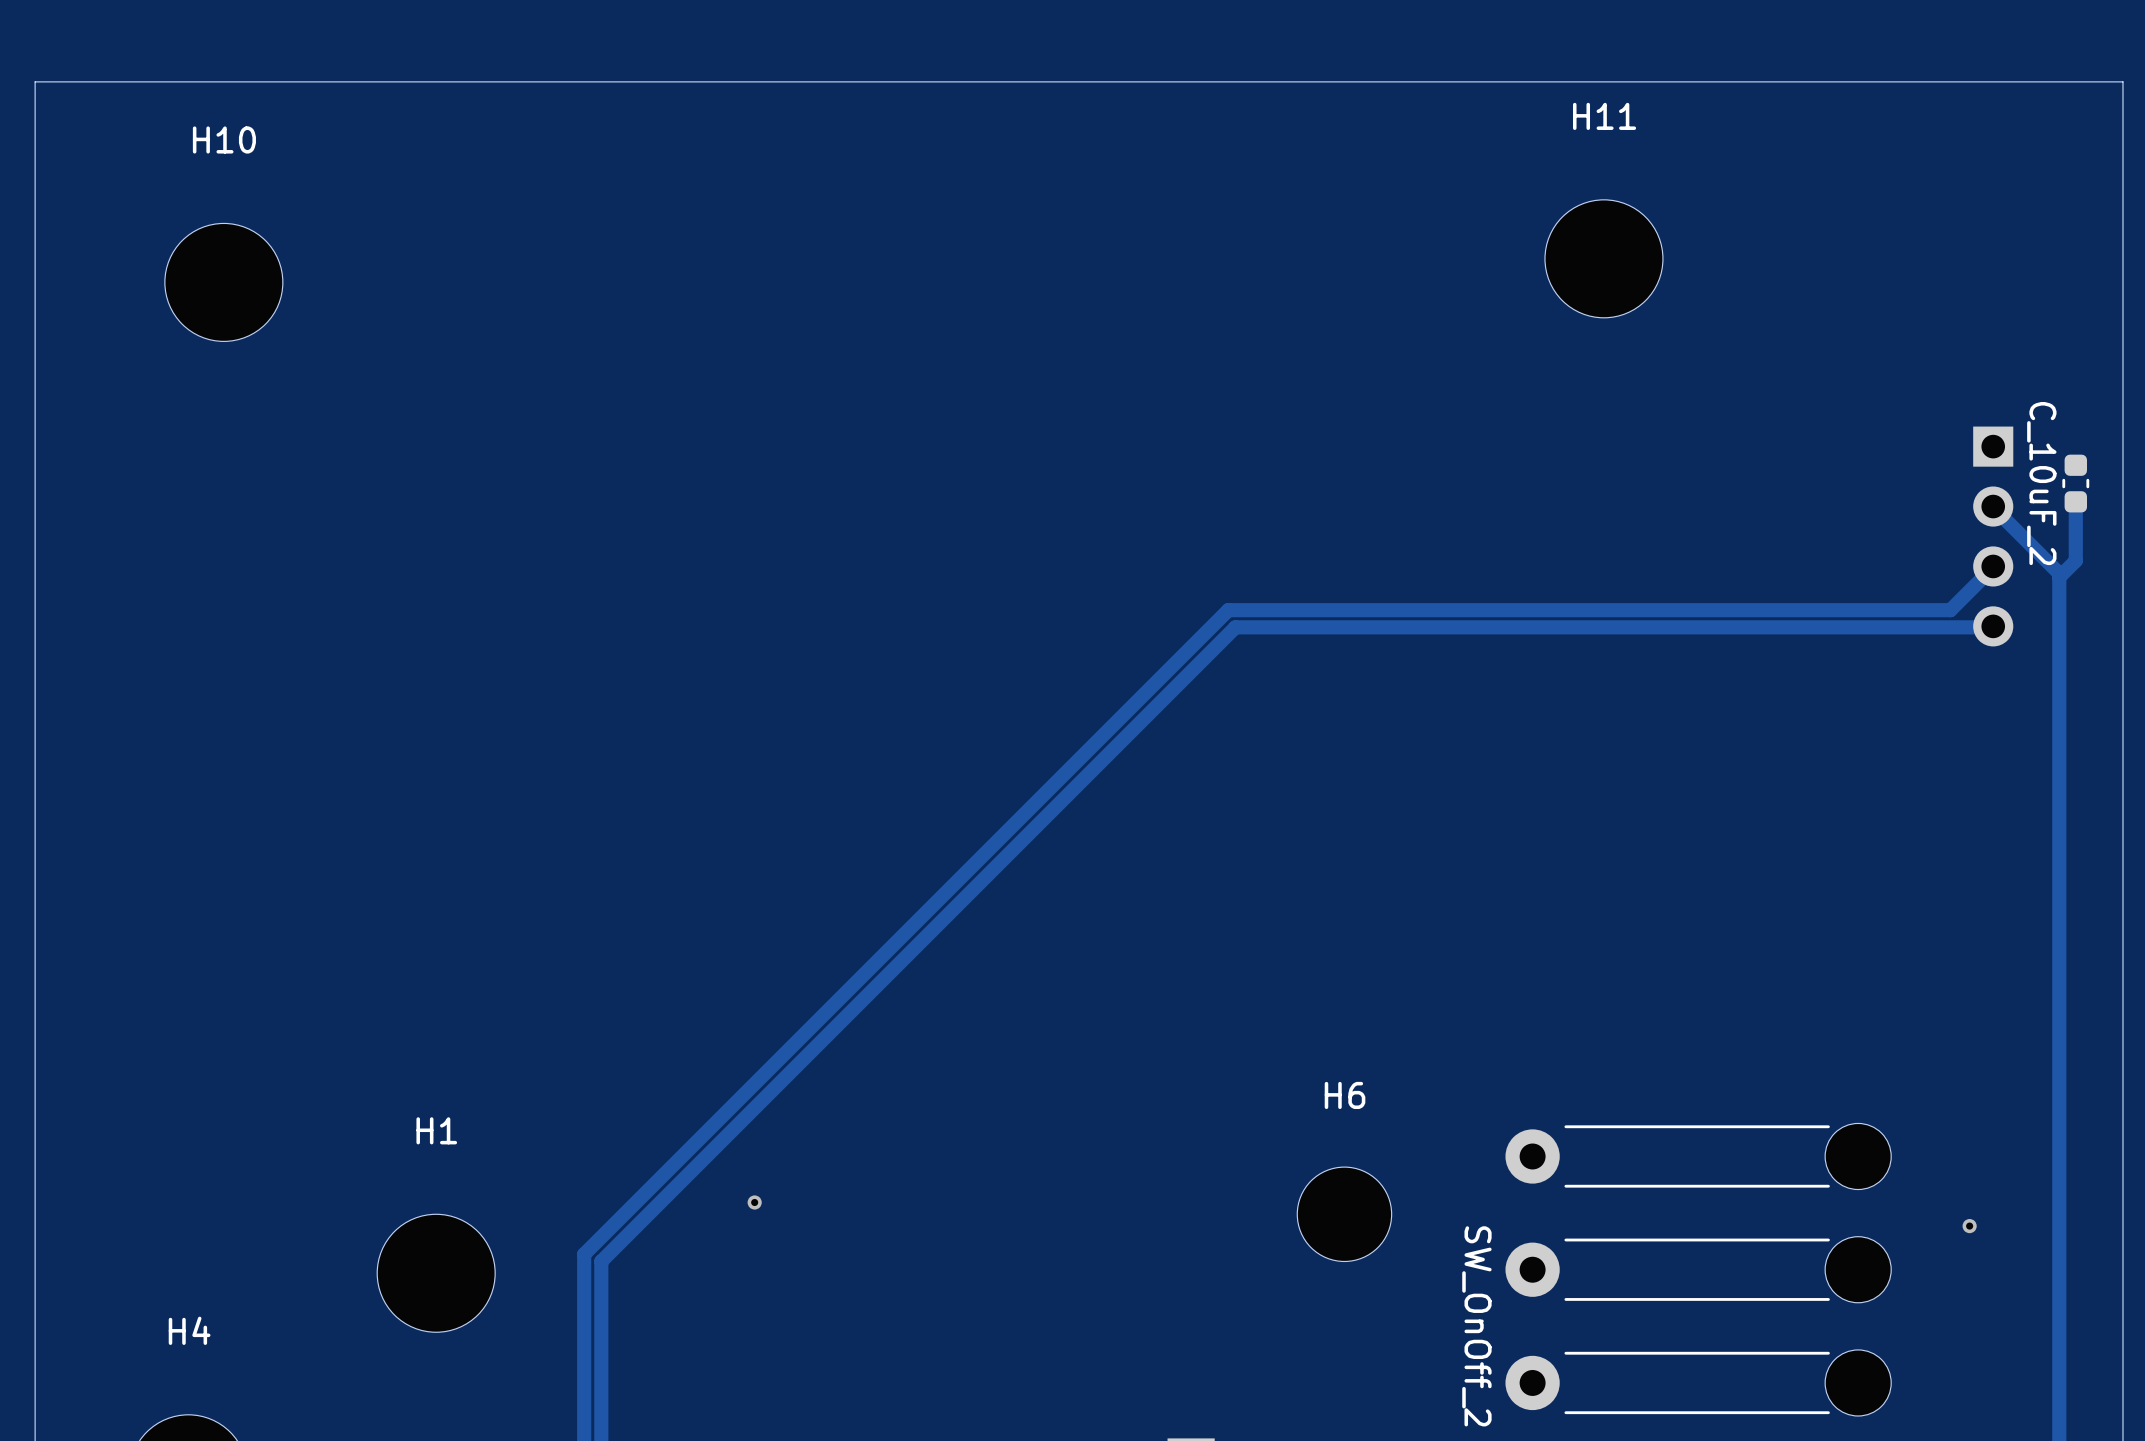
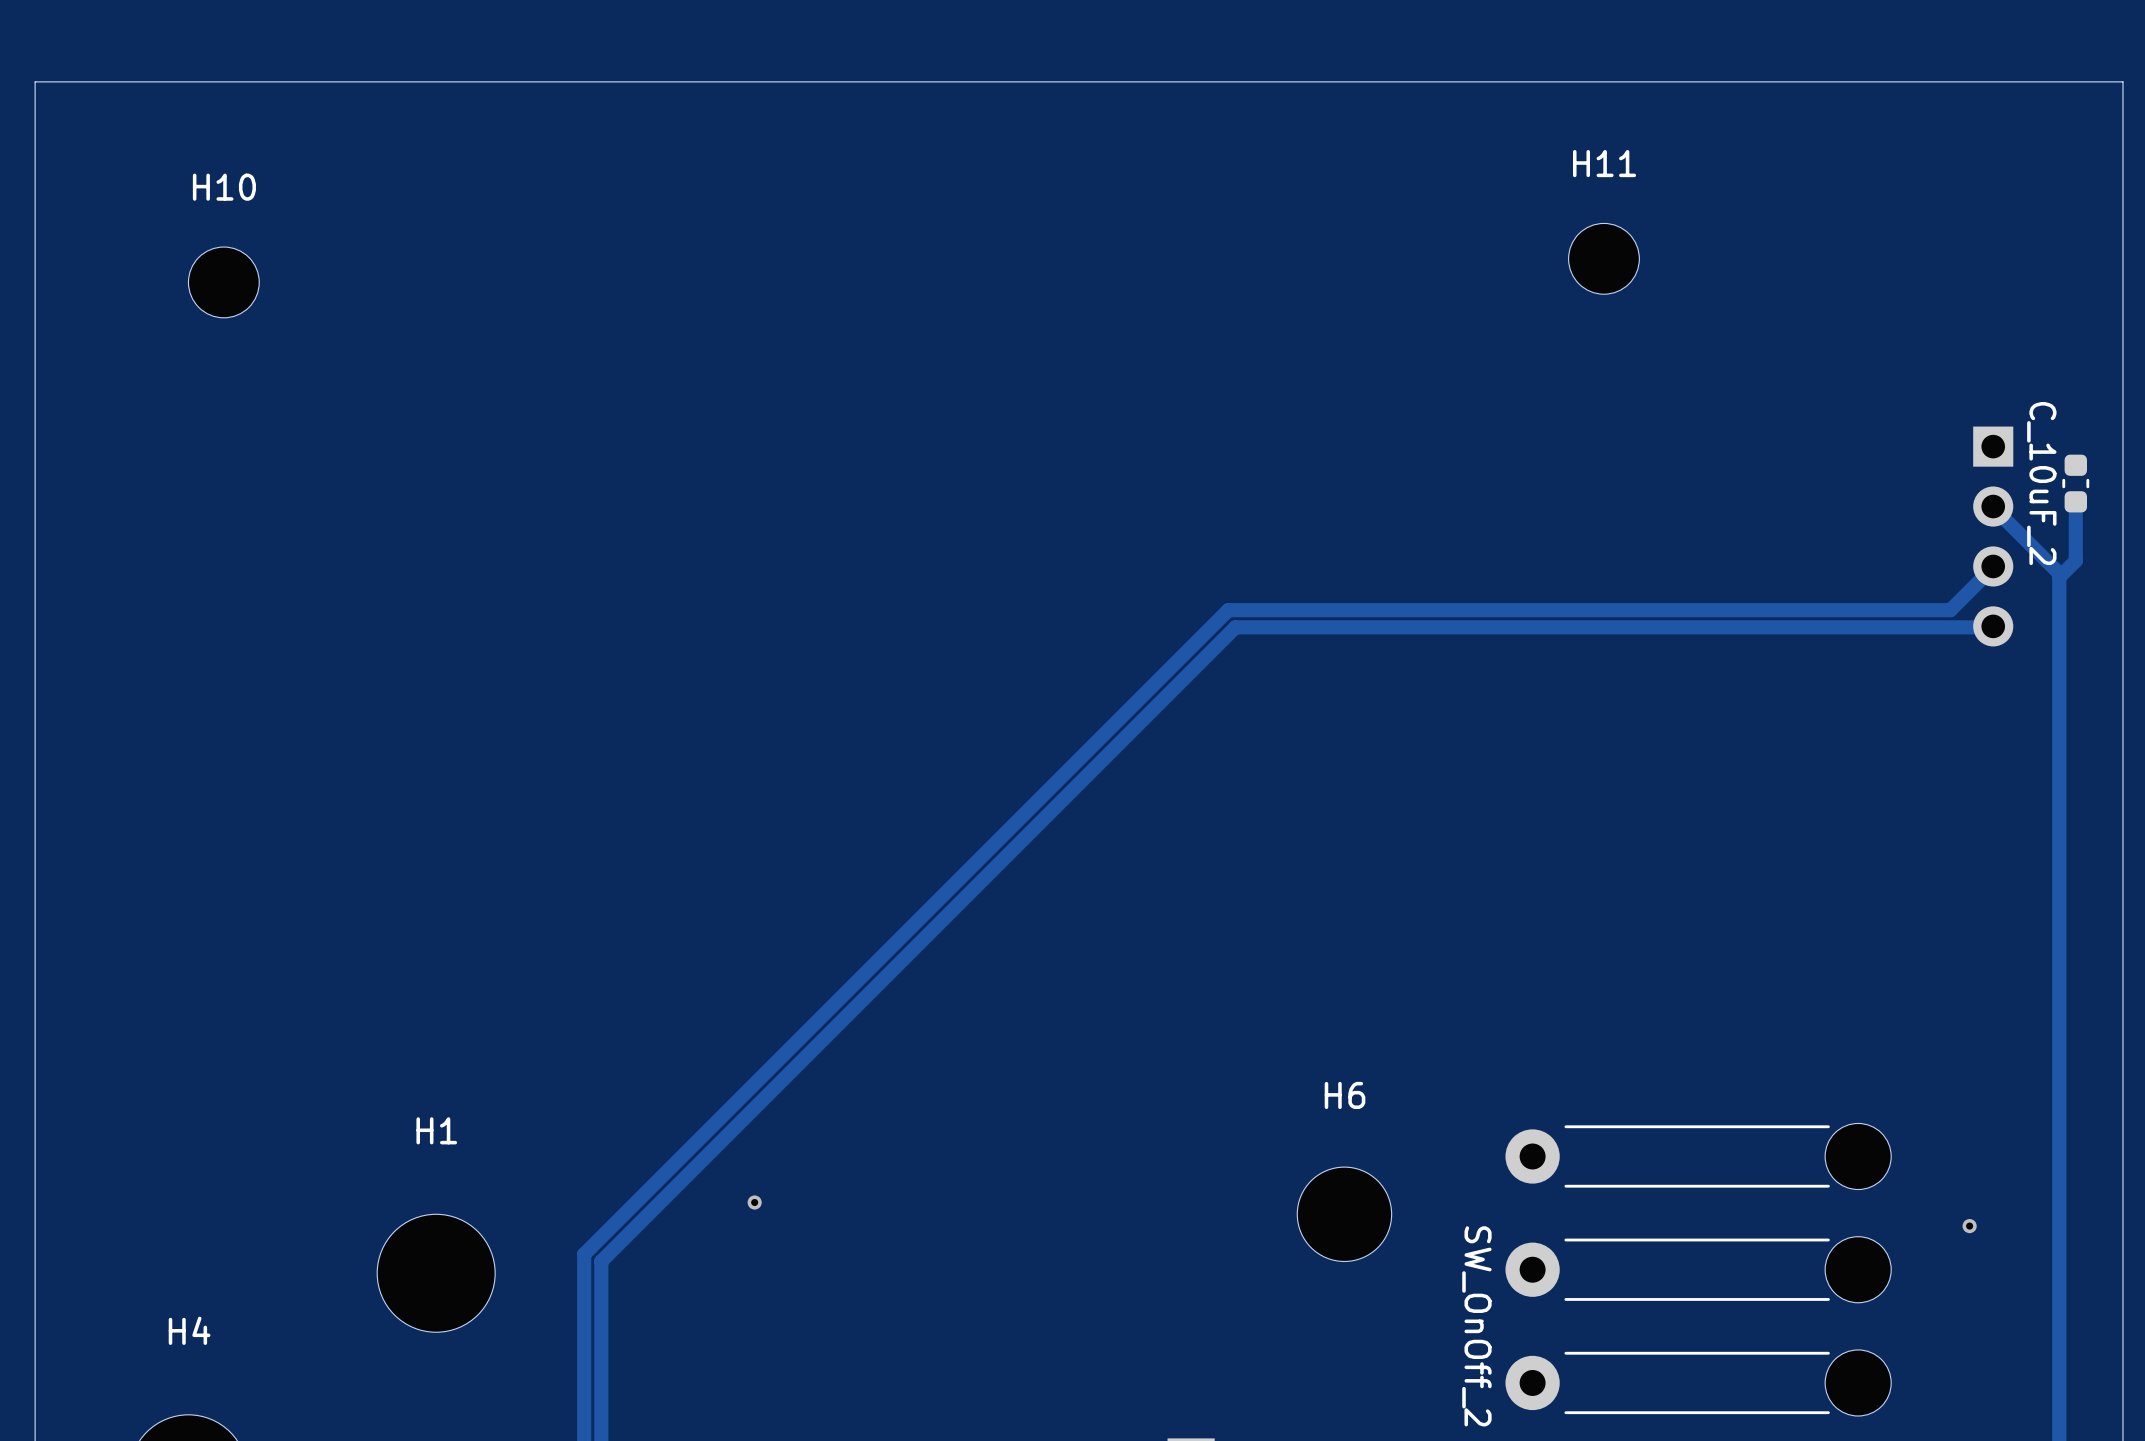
H11 footprint: [1544, 199, 1663, 318] -> [1568, 223, 1640, 295]
H10 footprint: [164, 223, 283, 342] -> [188, 247, 260, 318]

